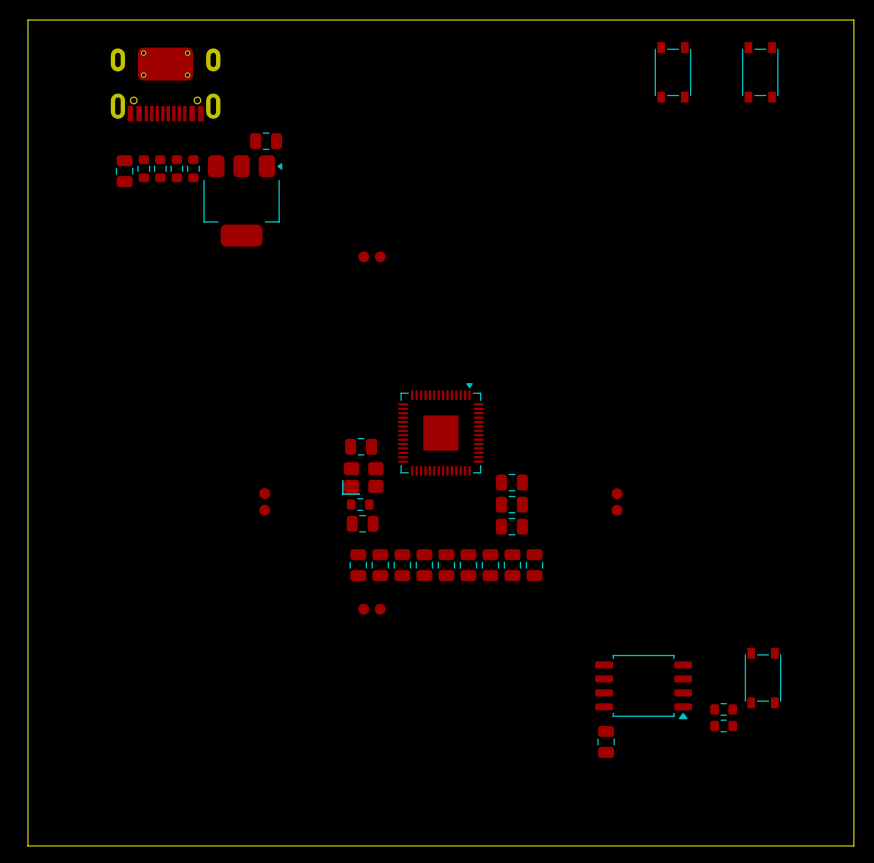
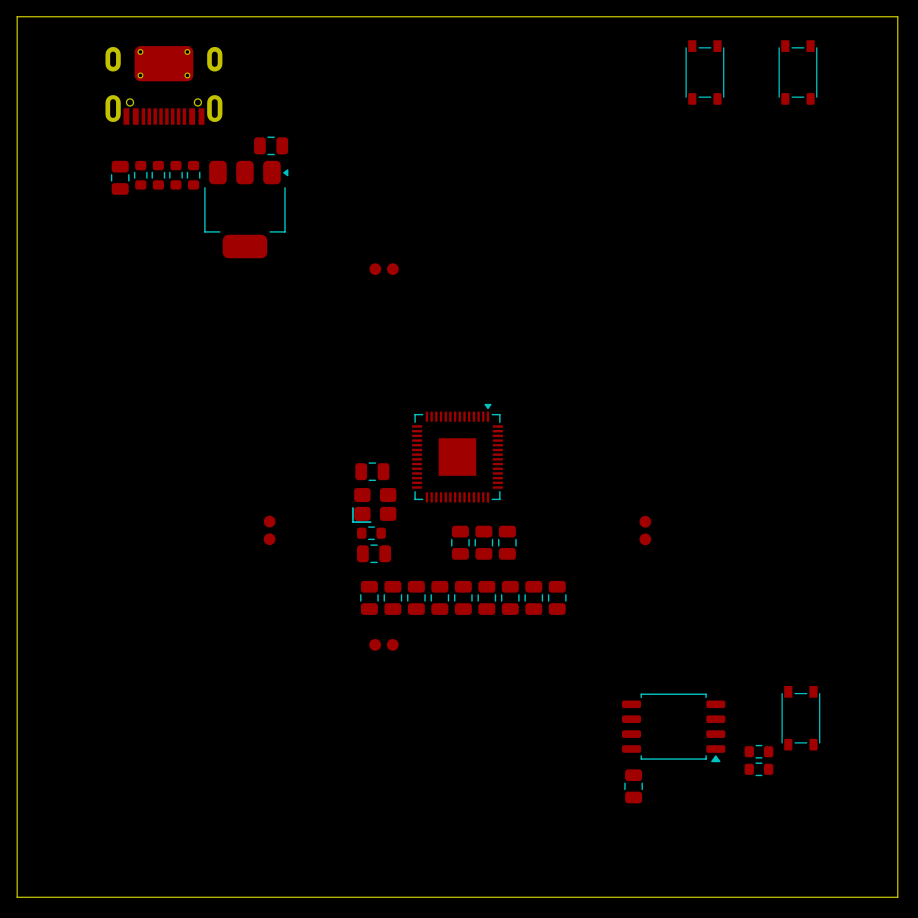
part: (511, 482) -> none
part: (511, 504) -> none
part: none -> (460, 542)
part: none -> (483, 542)
part: none -> (507, 542)
part: (511, 526) -> none

